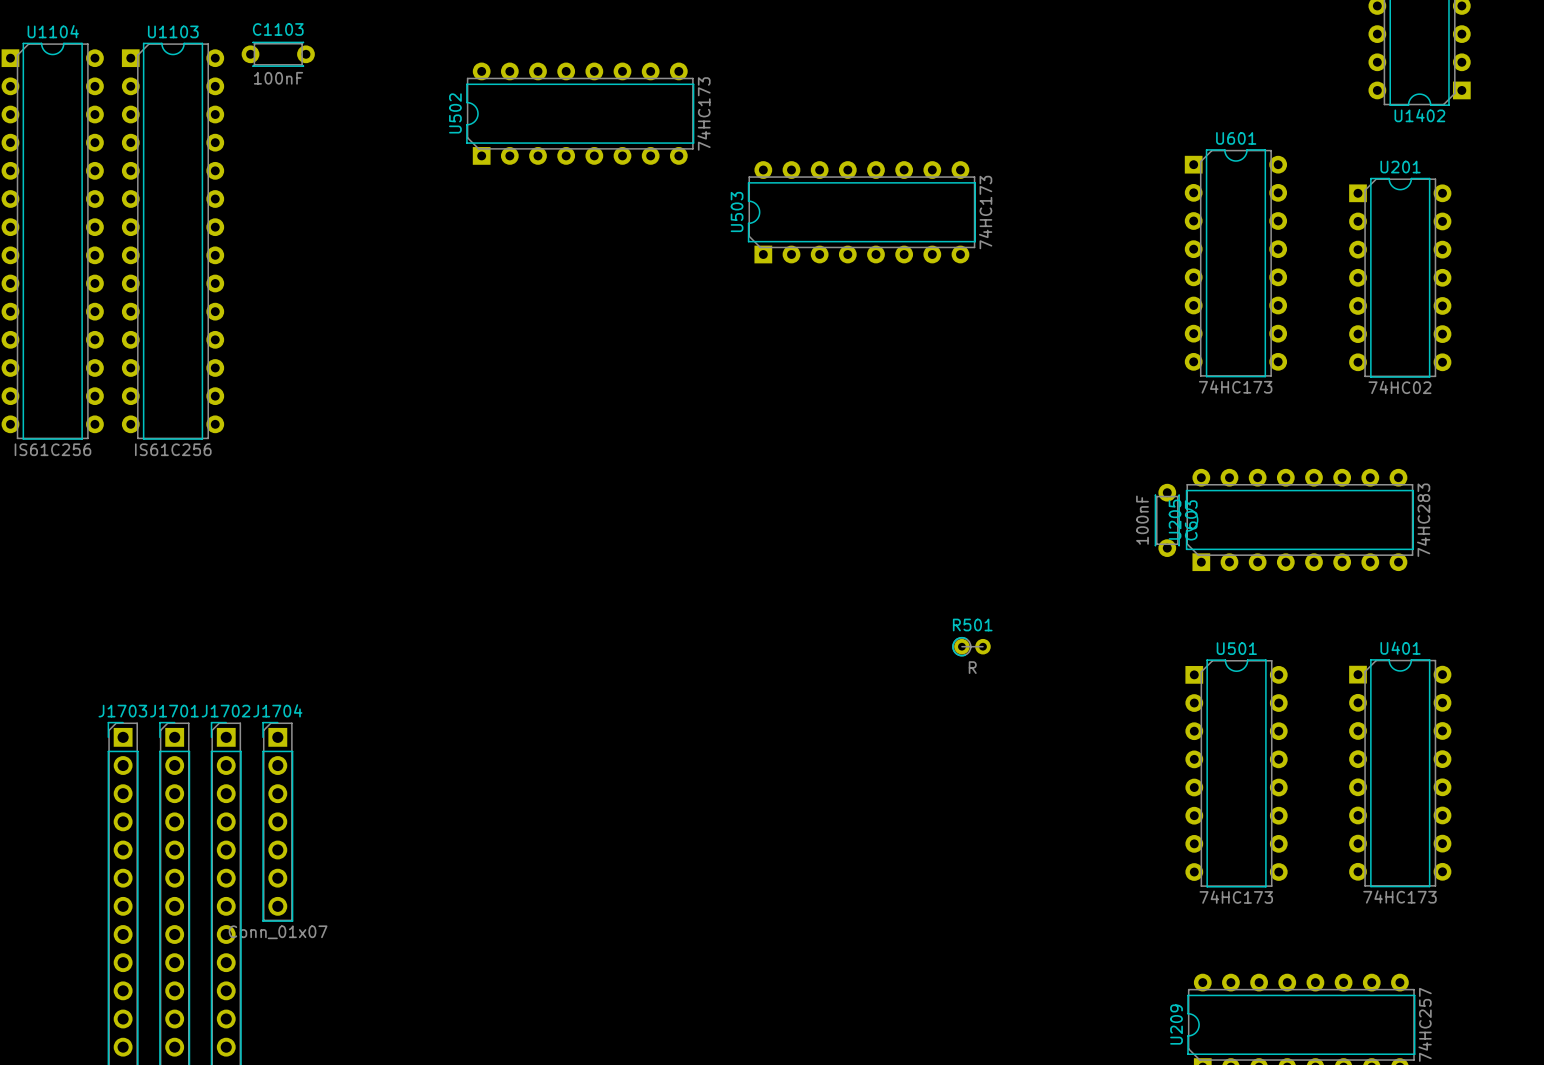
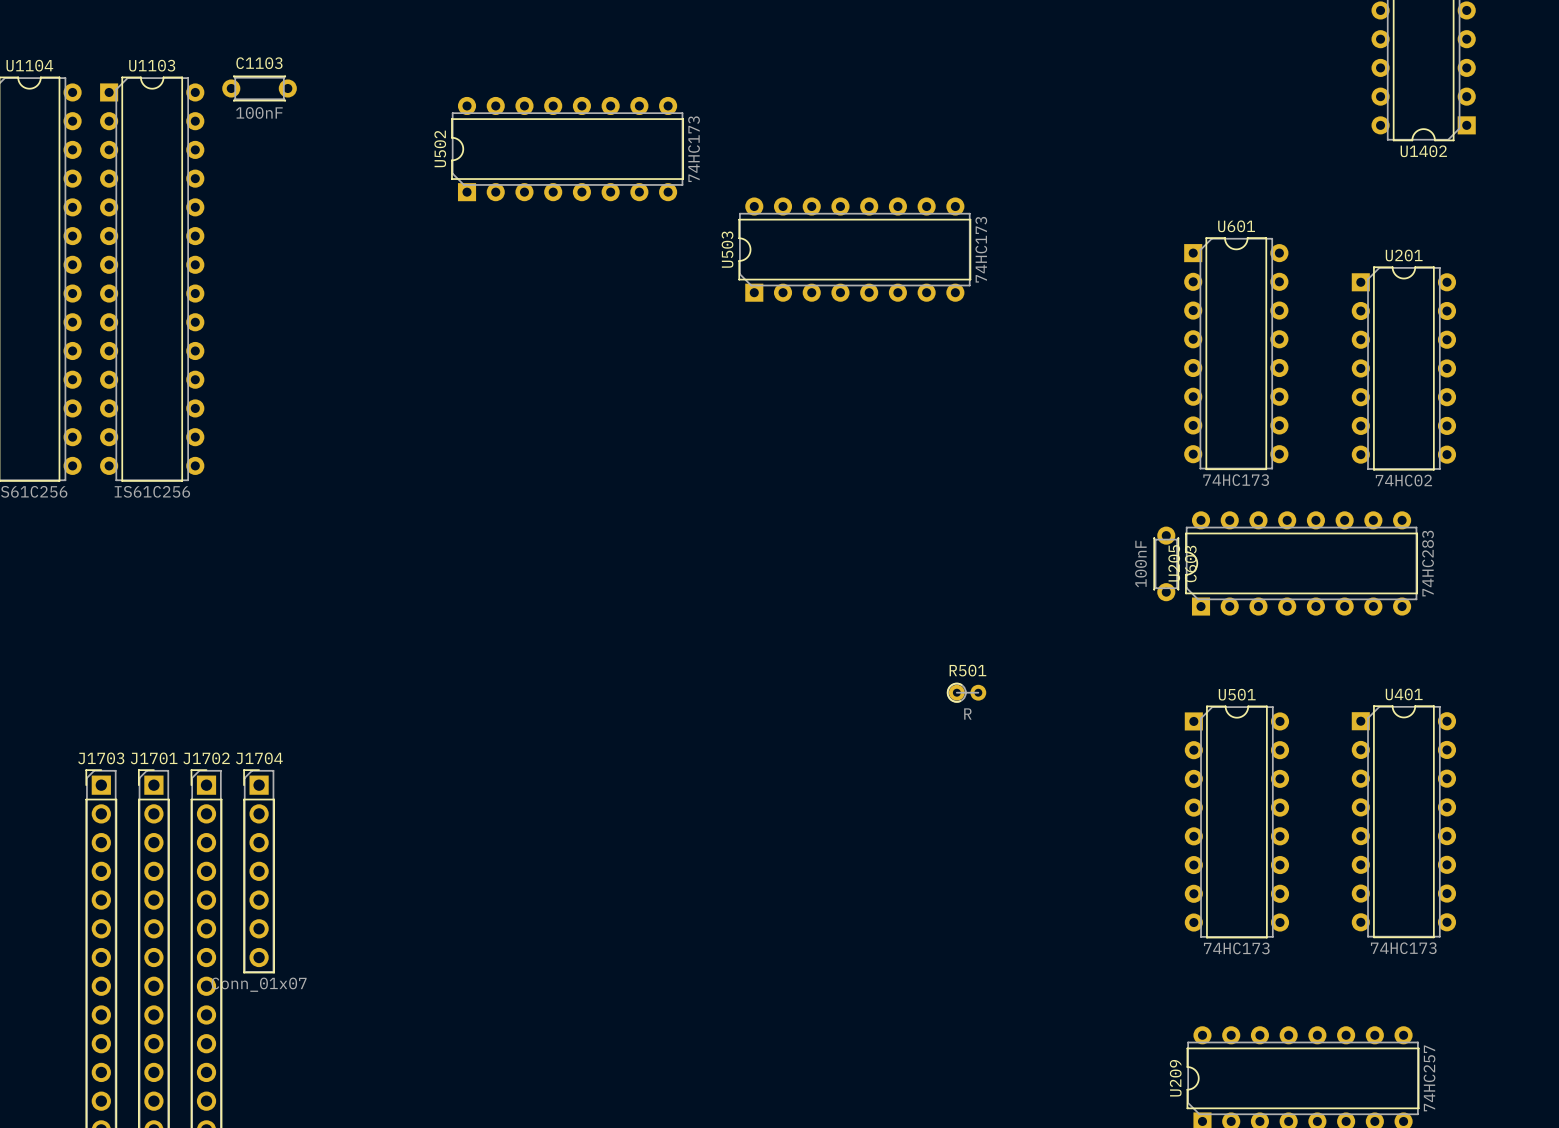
U601 position: (1235, 263) -> (1236, 353)
U201 position: (1400, 277) -> (1403, 368)

